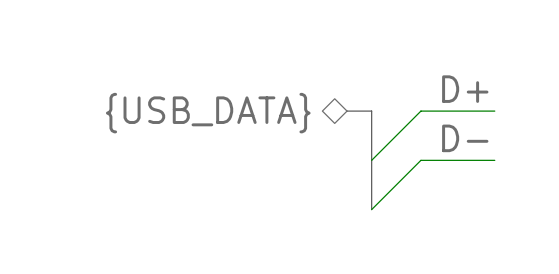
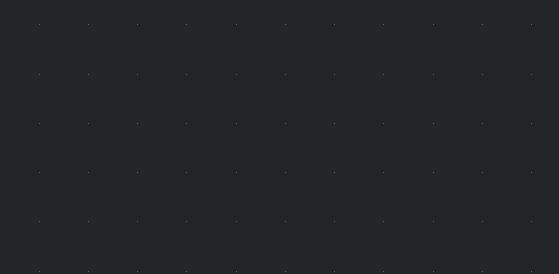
label: D+ (465, 89) -> none
bus: (347, 111) (371, 111) (371, 209) -> none
wire: (494, 111) (420, 111) (371, 160) -> none
hierarchical label: {USB_DATA} (208, 113) -> none
label: D- (465, 138) -> none
wire: (494, 160) (420, 160) (371, 209) -> none

